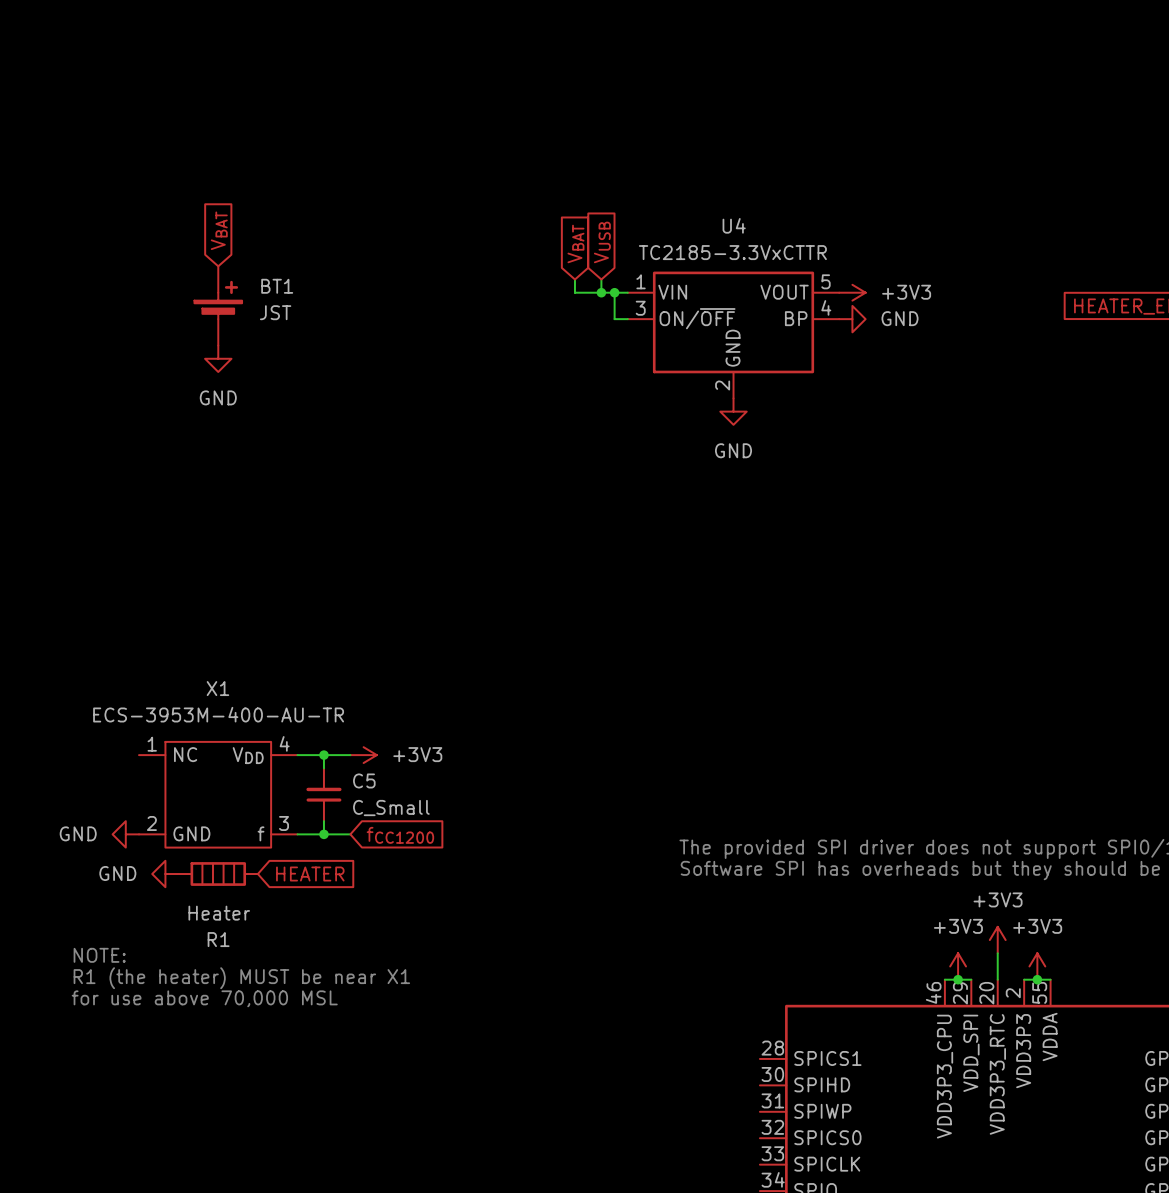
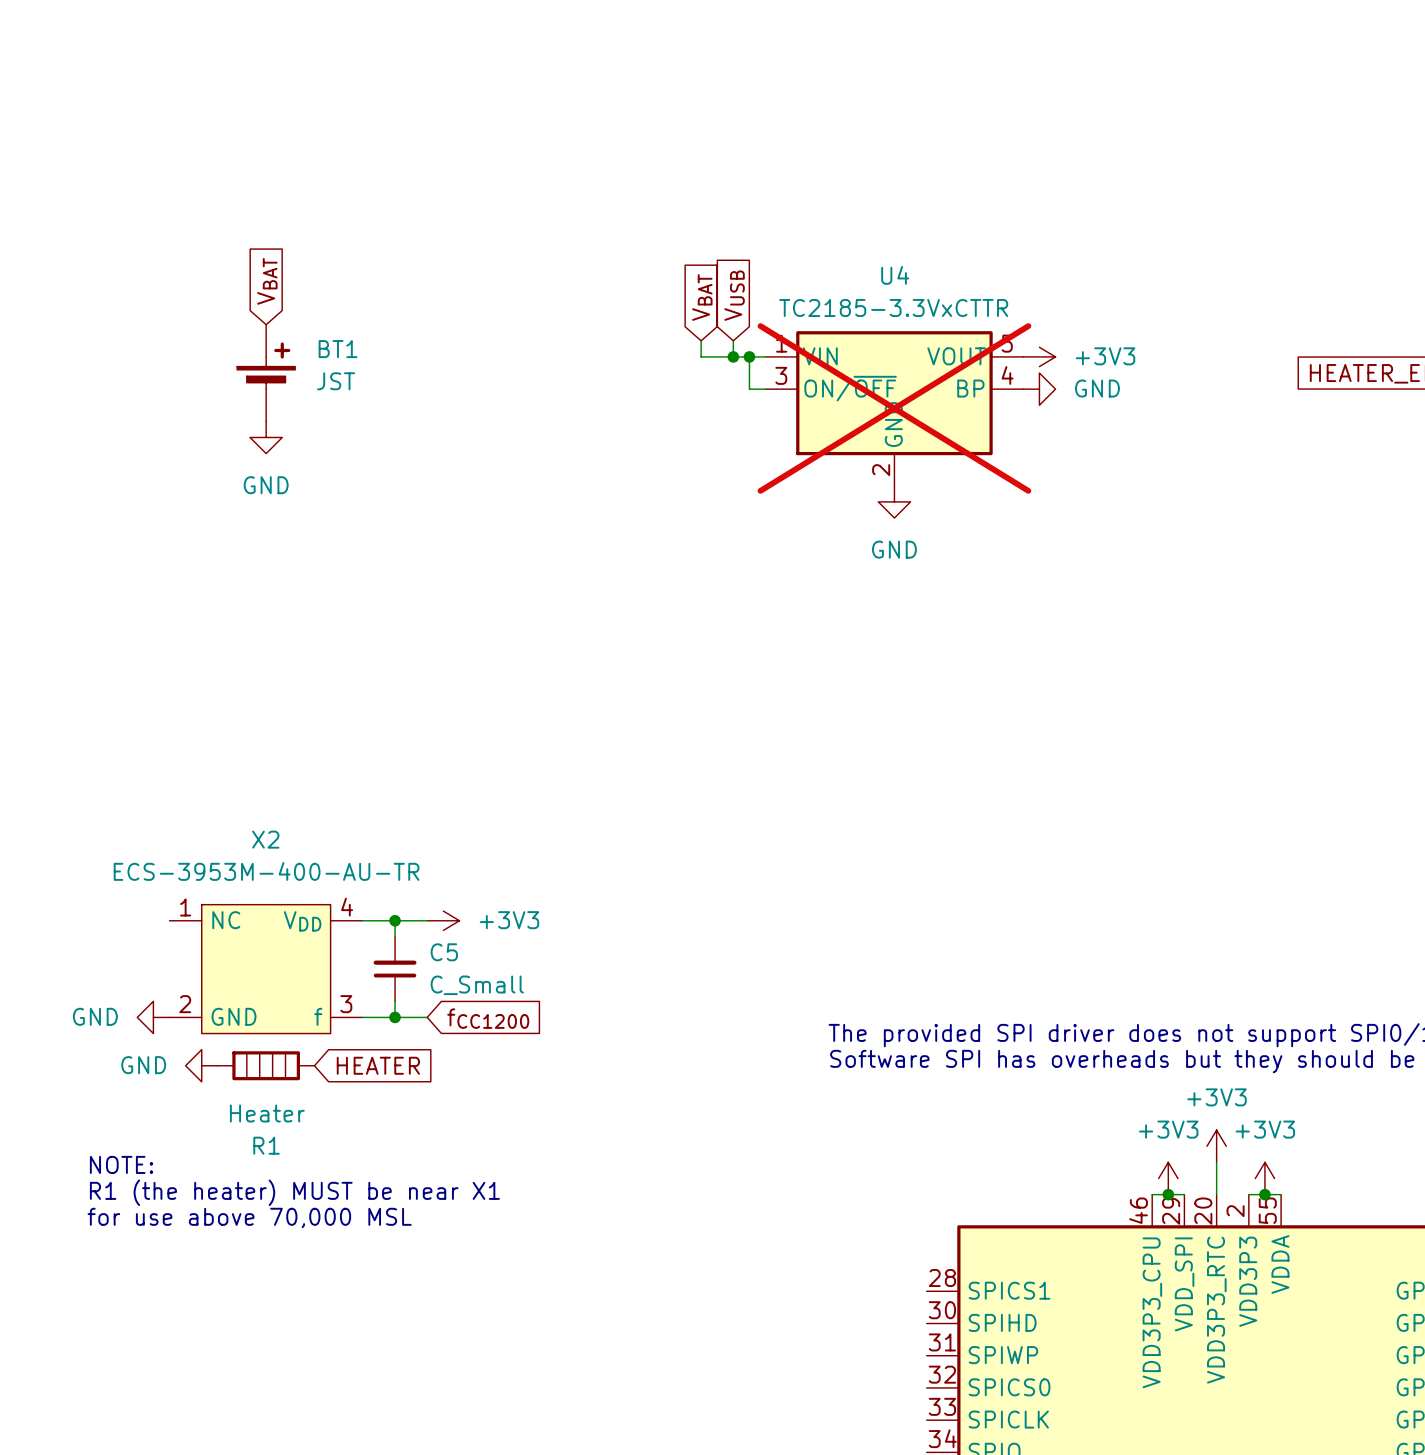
U4 do-not-place cross: none -> (894, 408)
X1 name: X1 (217, 688) -> X2 (265, 839)

